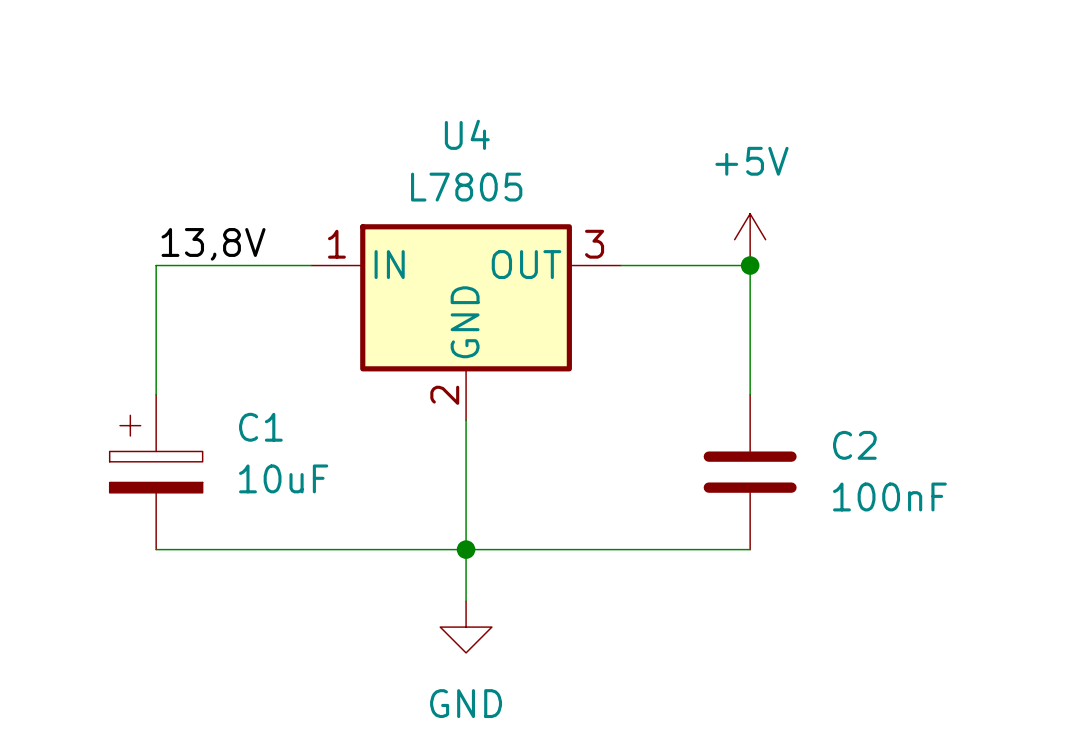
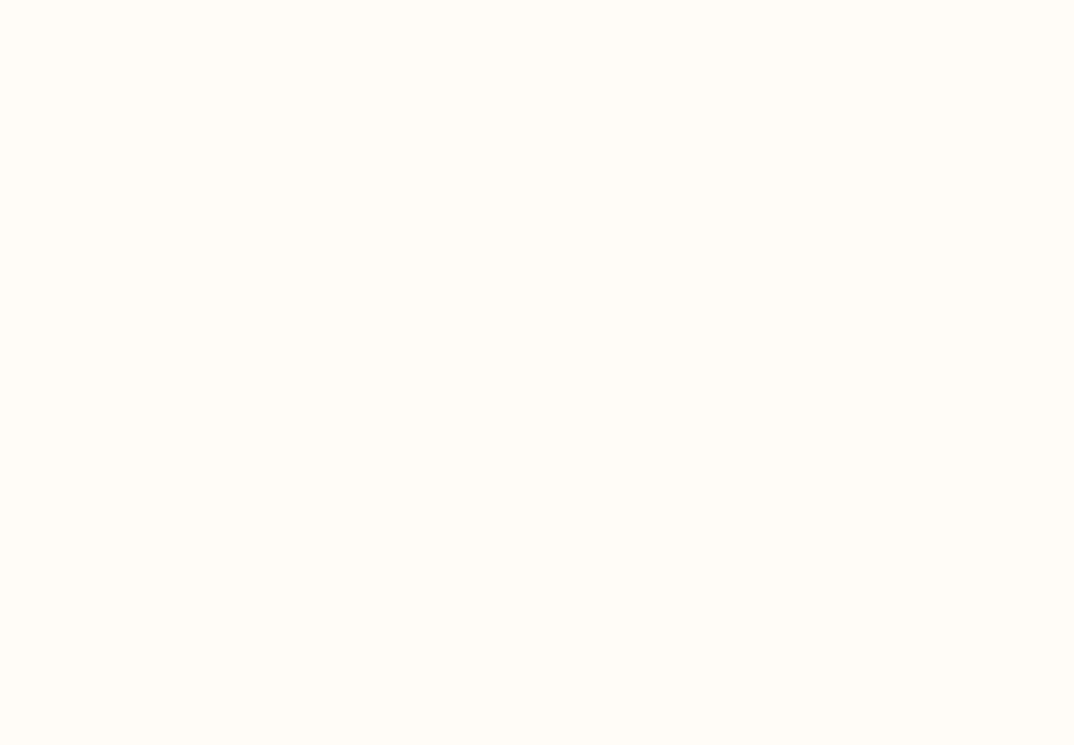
power symbol: +5V (750, 239) -> none
label: 13,8V (213, 244) -> none
wire: (311, 265) (156, 265) (156, 394) -> none
wire: (621, 265) (750, 265) (750, 394) -> none
junction: (750, 265) -> none
U4: L7805 (466, 322) -> none
wire: (466, 420) (466, 601) -> none
C1: 10uF (156, 472) -> none
C2: 100nF (750, 472) -> none
wire: (156, 549) (750, 549) -> none
junction: (466, 549) -> none
power symbol: GND (466, 627) -> none

